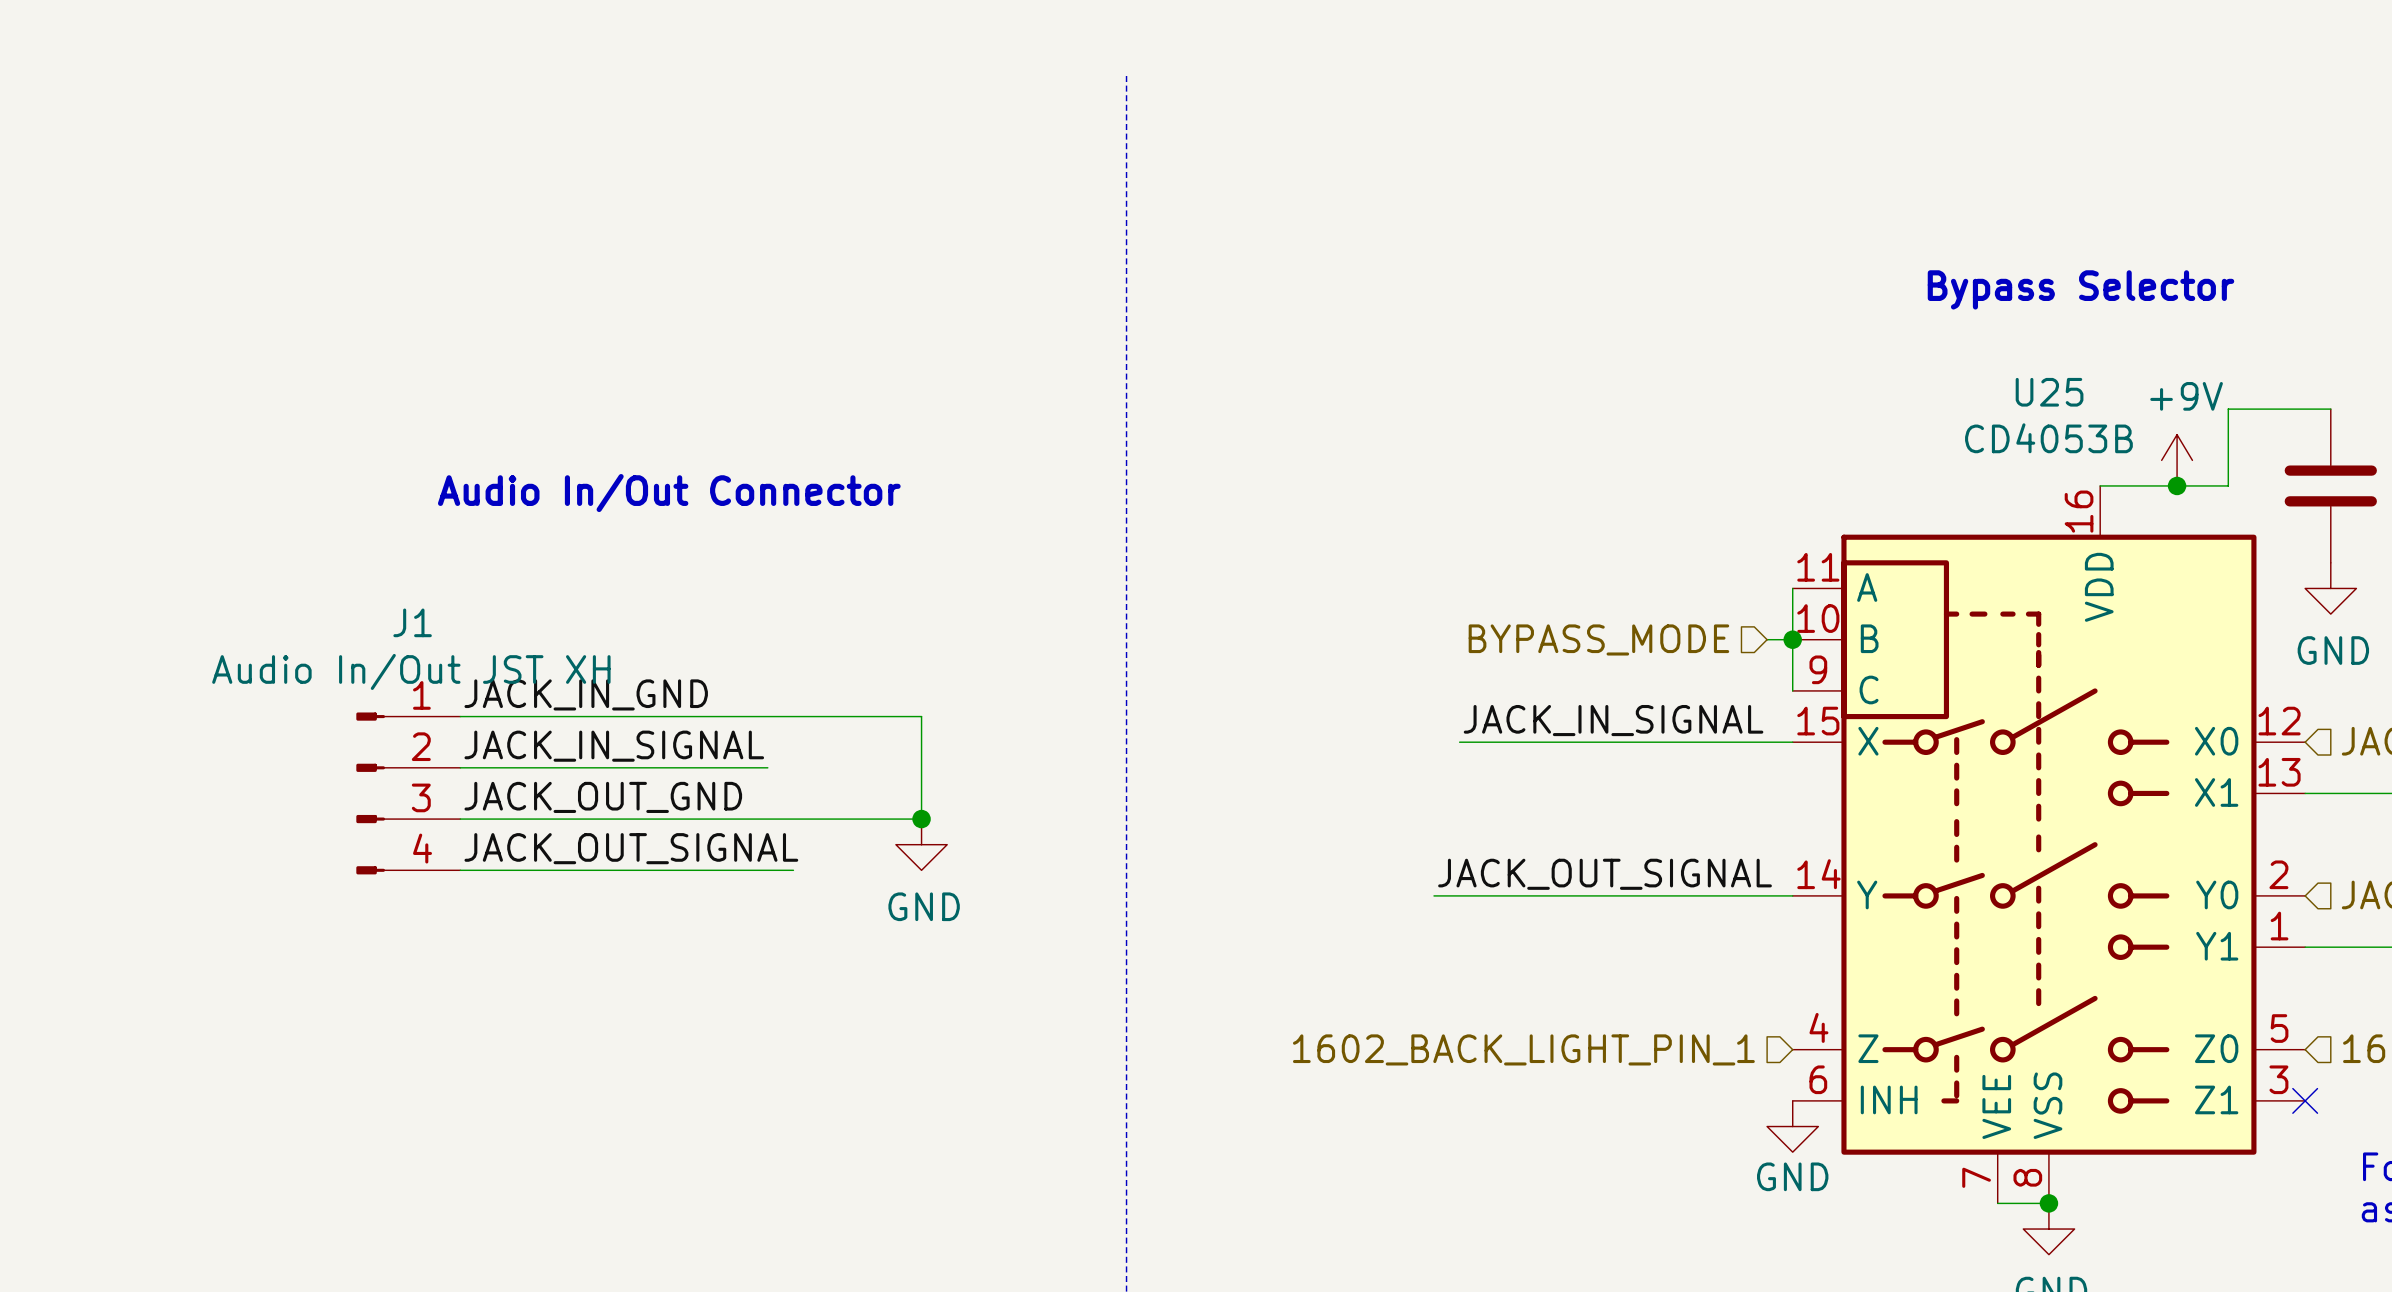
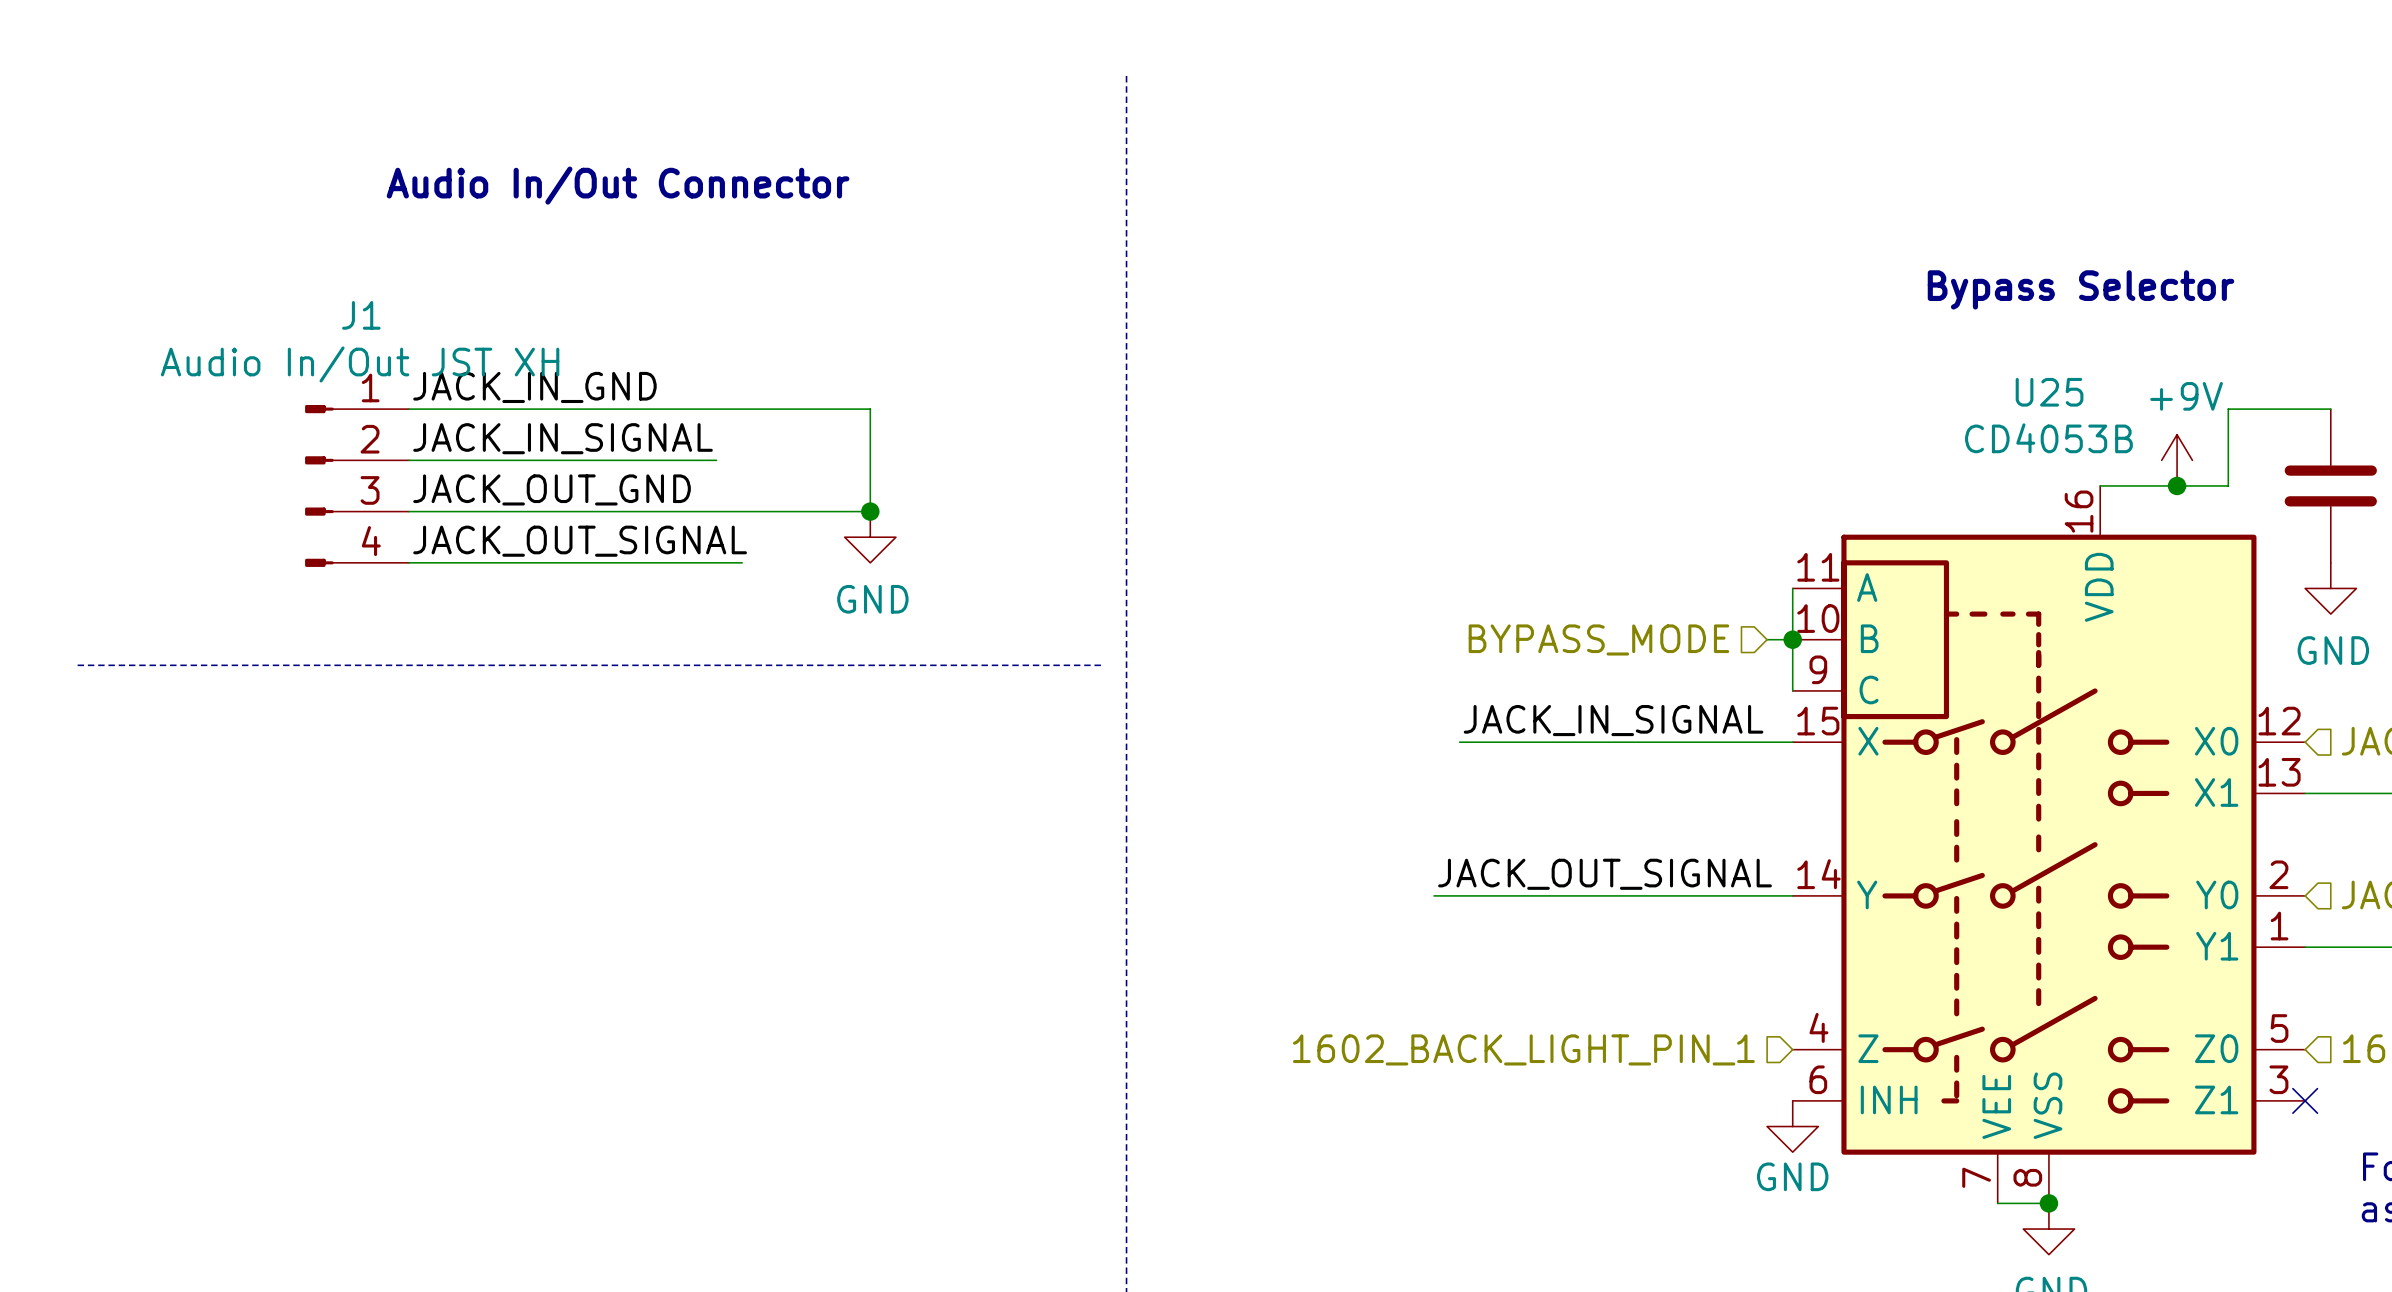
text position: Audio In/Out Connector (669, 493) -> Audio In/Out Connector (618, 185)
junction: none -> (870, 511)
line: none -> (76, 665) (1100, 665)
label position: JACK_IN_GND (586, 694) -> JACK_IN_GND (534, 387)
wire: (460, 716) (921, 716) (921, 819) (460, 819) -> (409, 409) (870, 409) (870, 511) (409, 511)
label position: JACK_IN_SIGNAL (614, 746) -> JACK_IN_SIGNAL (563, 438)
wire: (460, 767) (767, 767) -> (409, 460) (716, 460)
J1 position: (408, 793) -> (357, 485)
label position: JACK_OUT_GND (603, 797) -> JACK_OUT_GND (552, 489)
junction: (921, 819) -> none
power symbol position: GND (921, 844) -> GND (870, 537)
label position: JACK_OUT_SIGNAL (631, 848) -> JACK_OUT_SIGNAL (580, 541)
wire: (460, 870) (793, 870) -> (409, 562) (742, 562)

